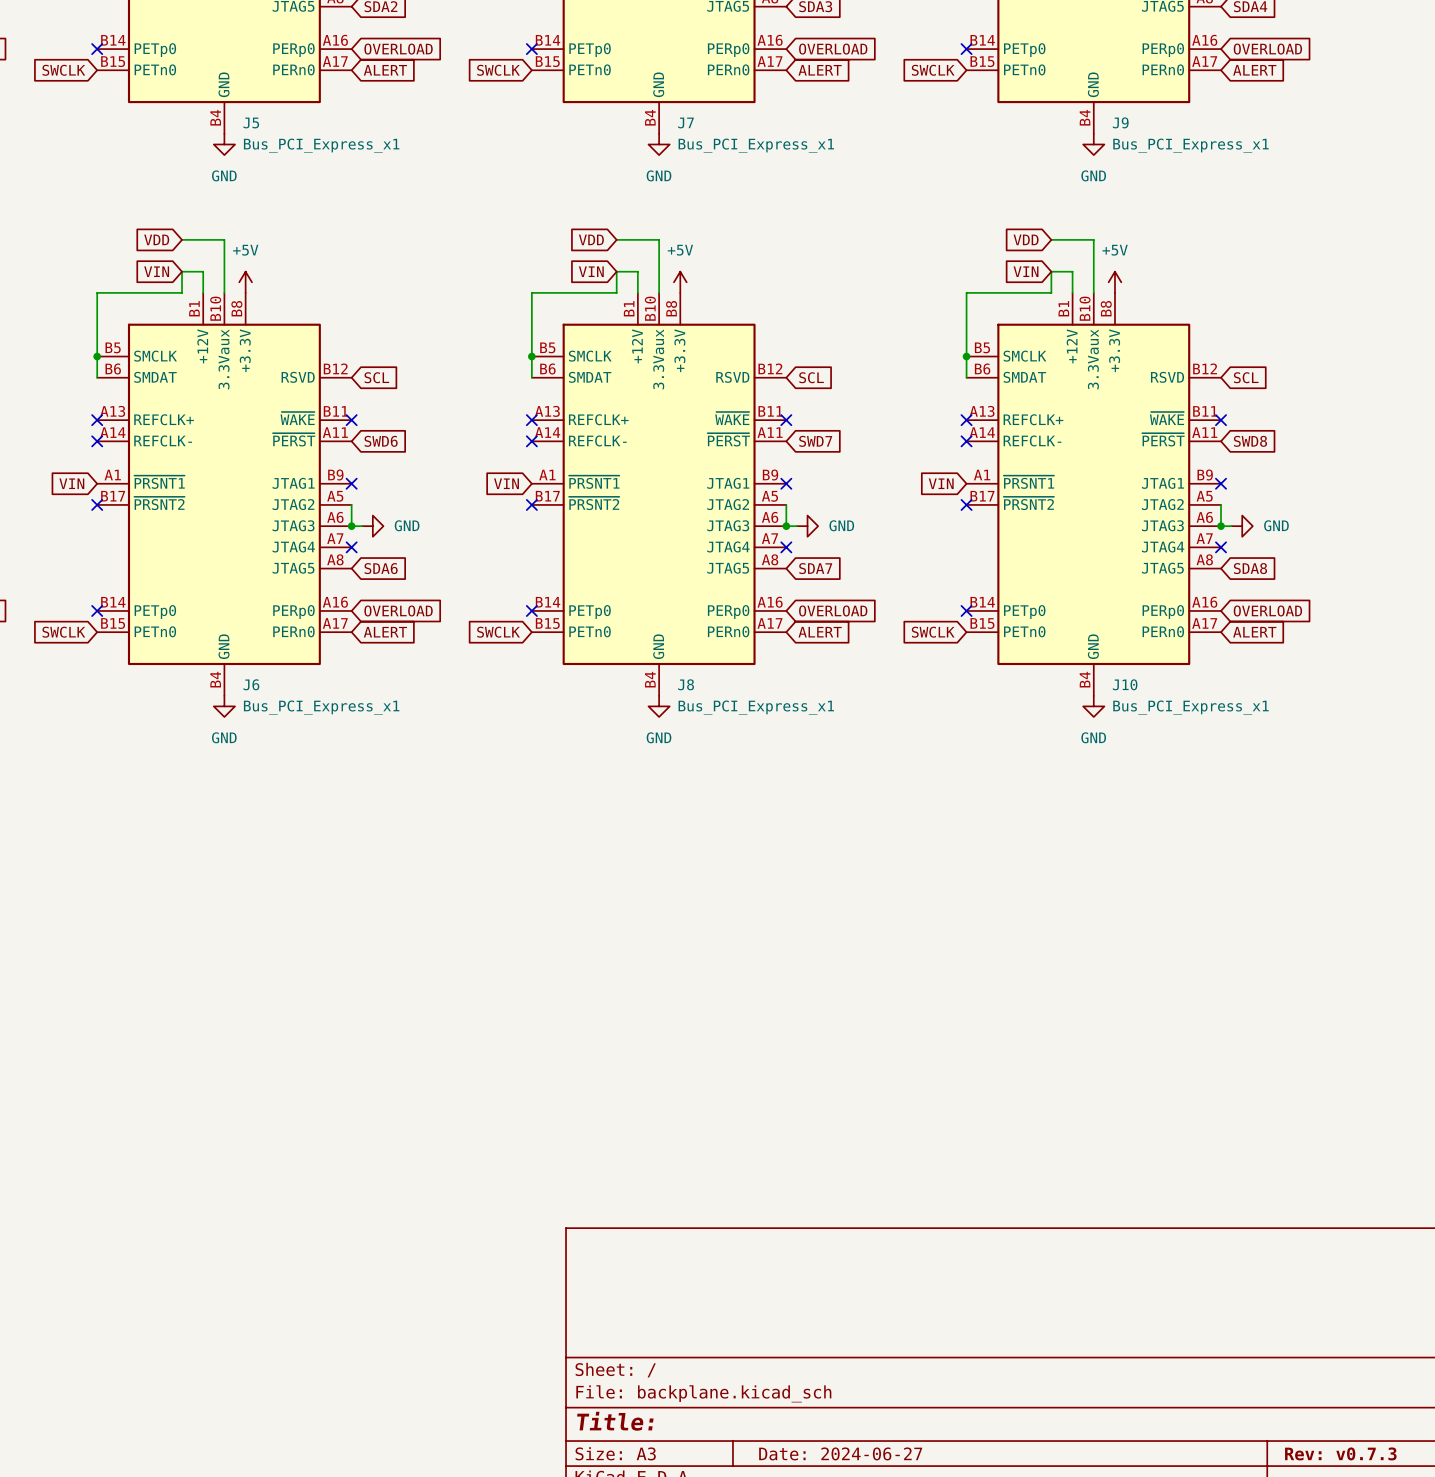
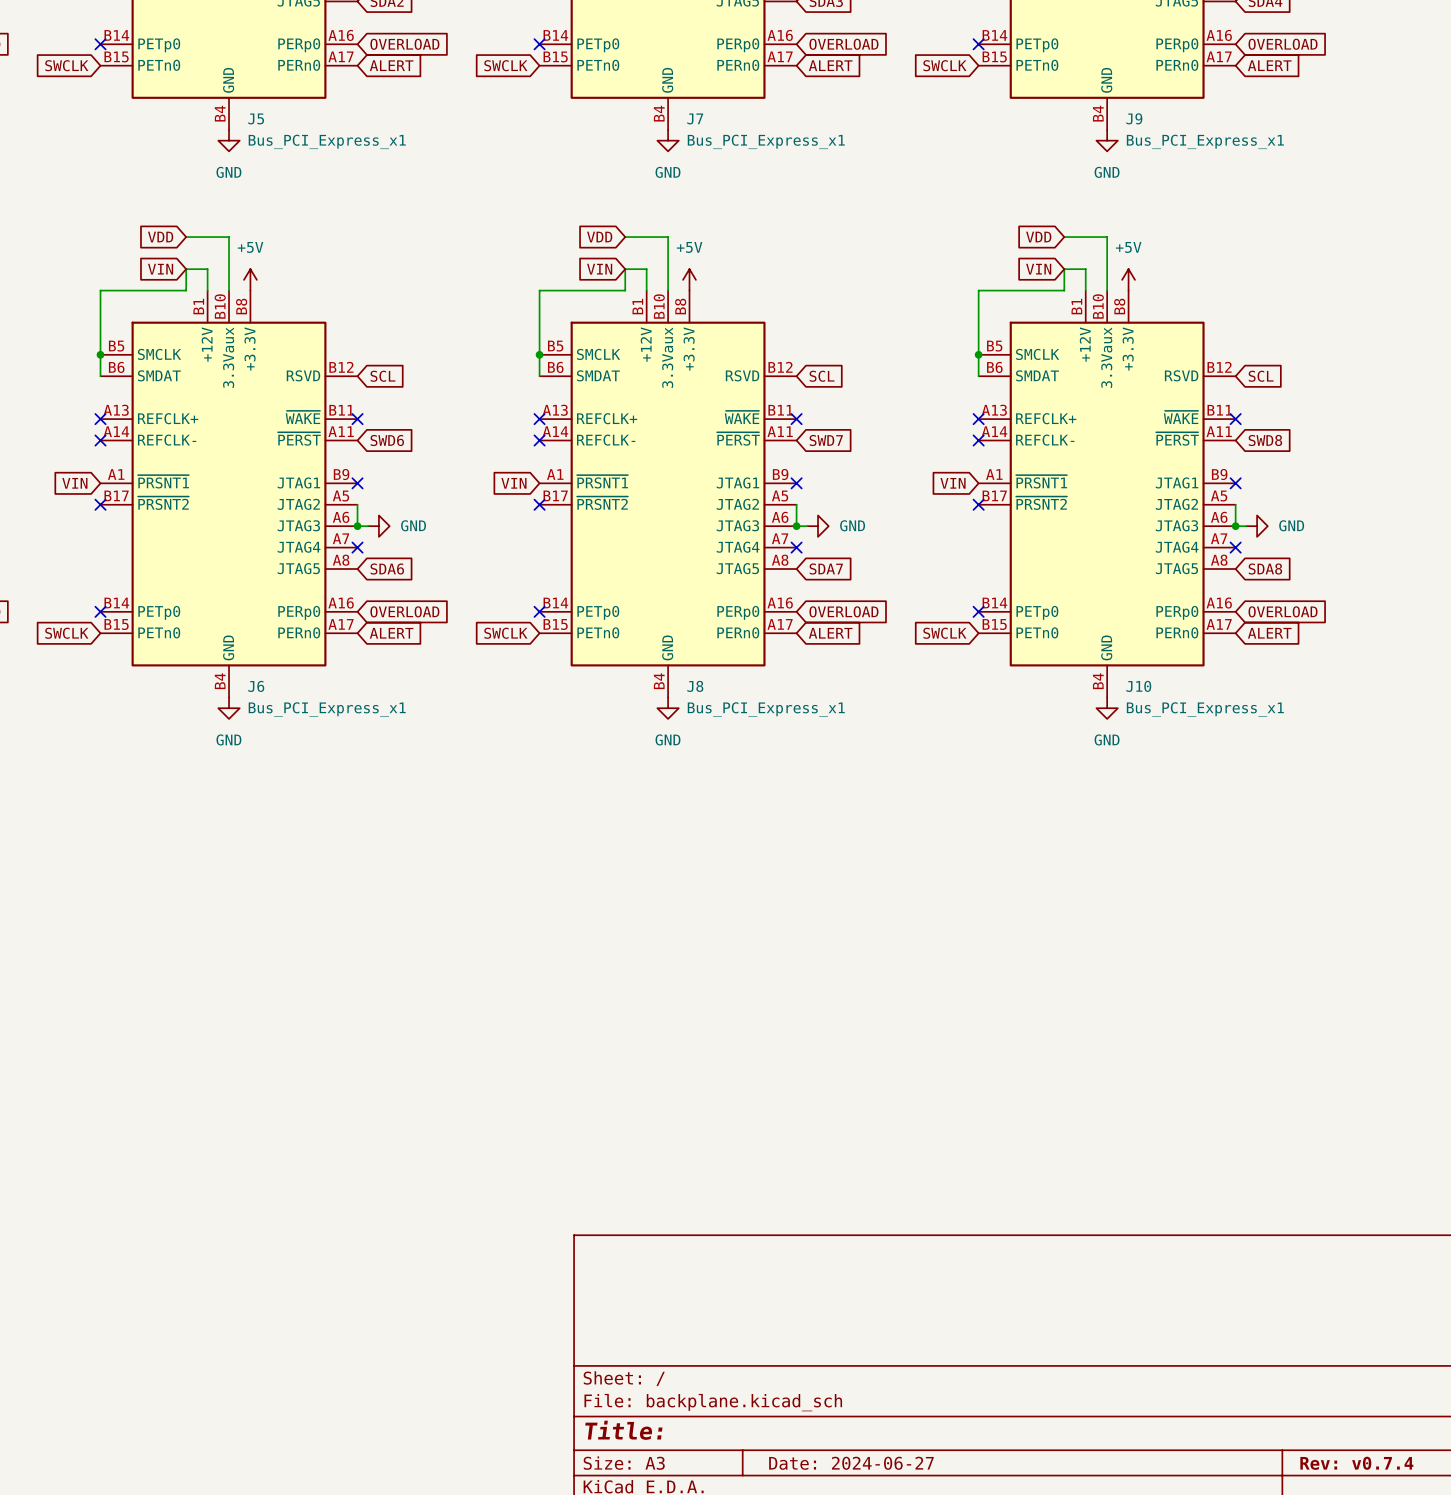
title block: Rev: v0.7.3 (1340, 1453) -> Rev: v0.7.4 (1356, 1463)

